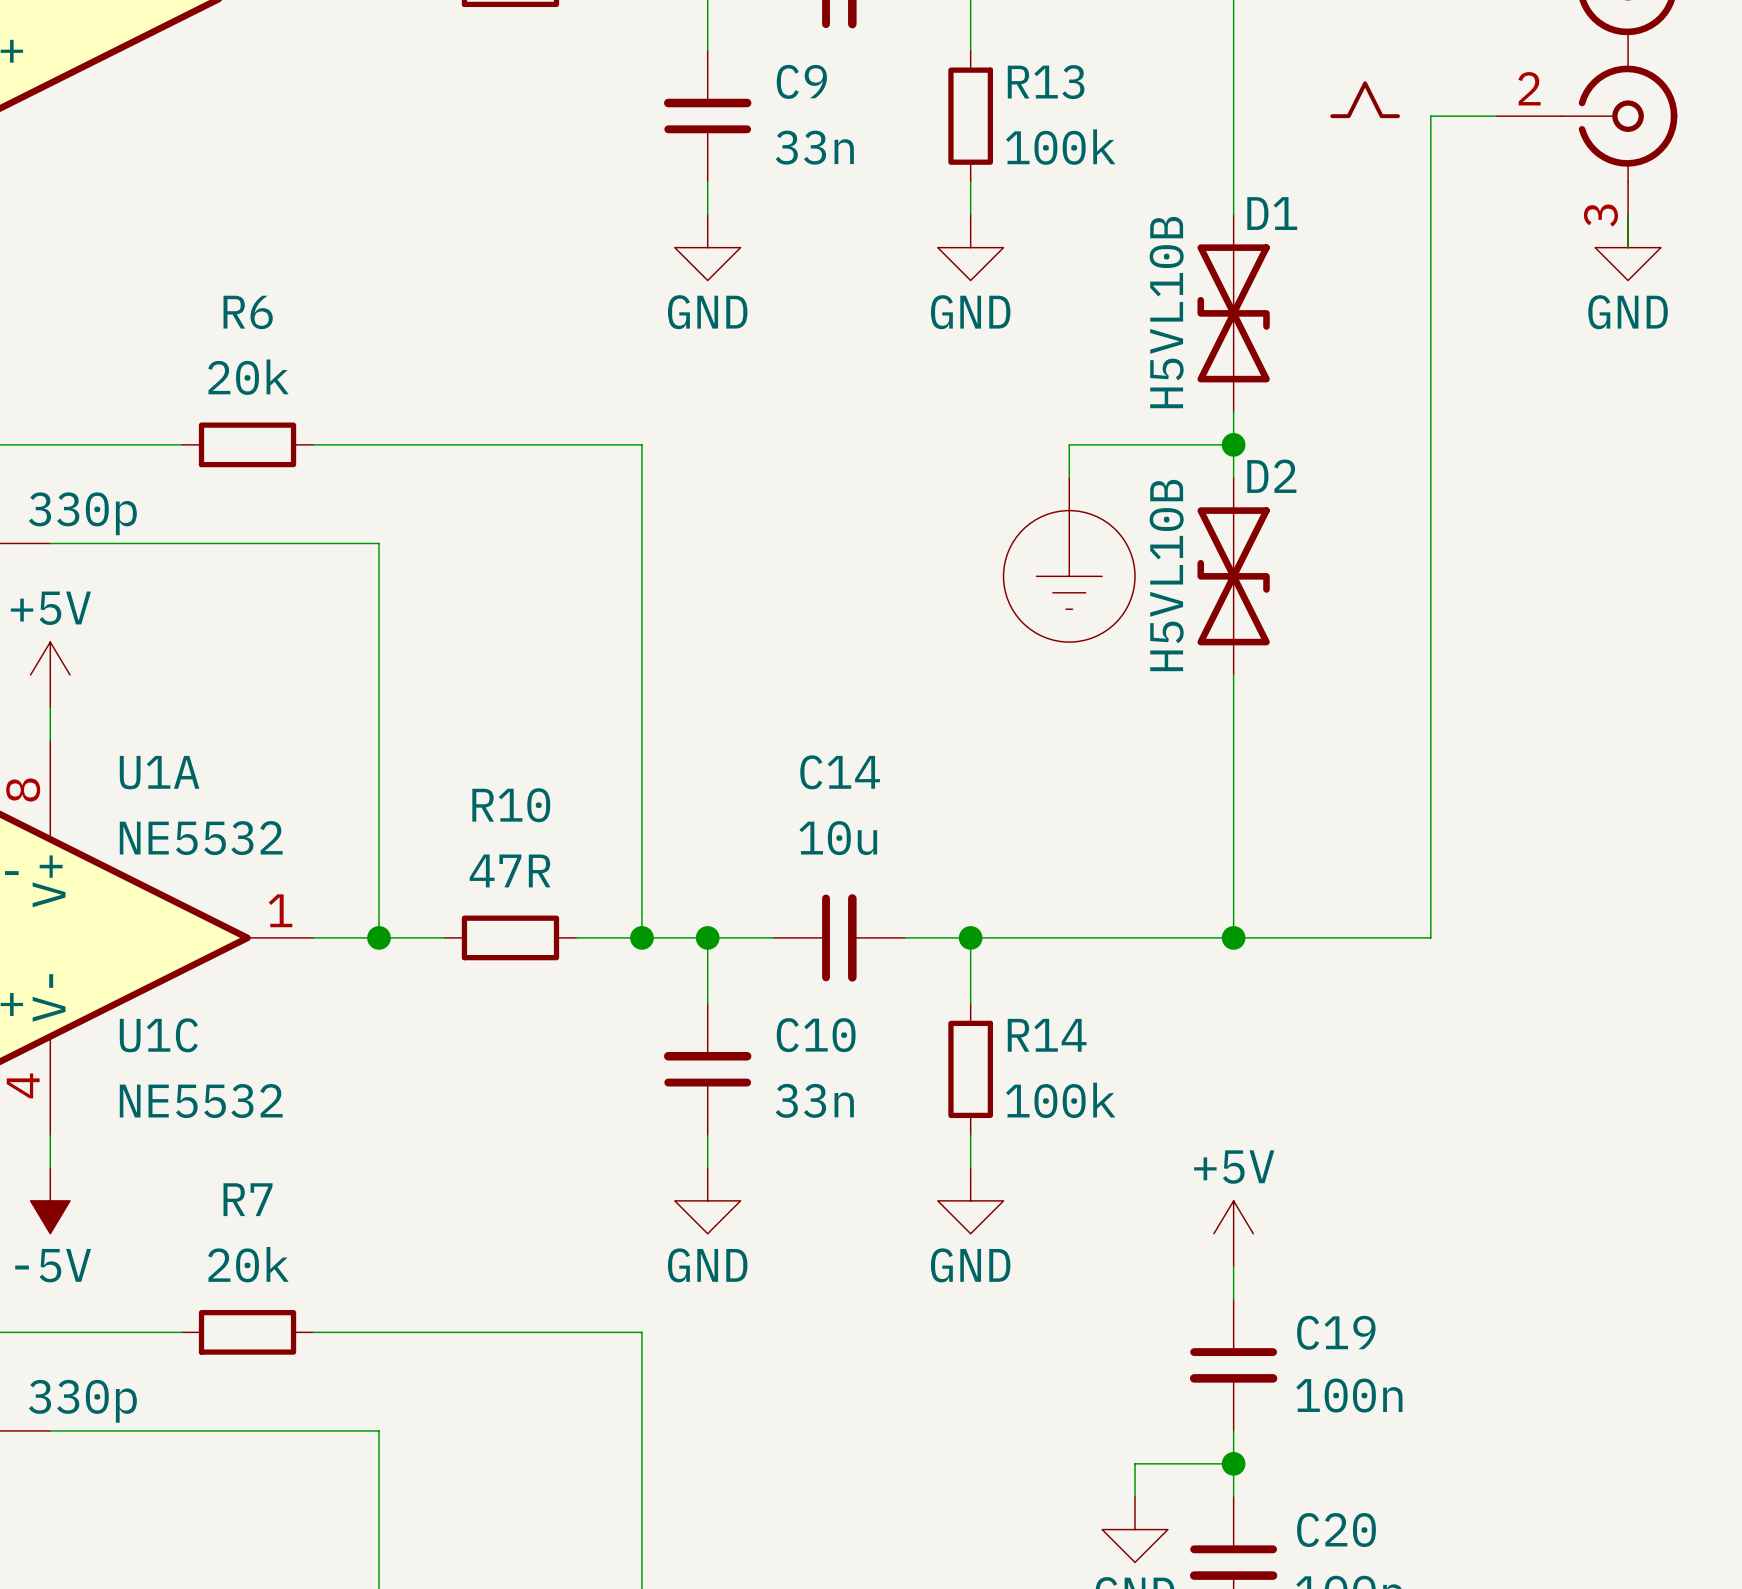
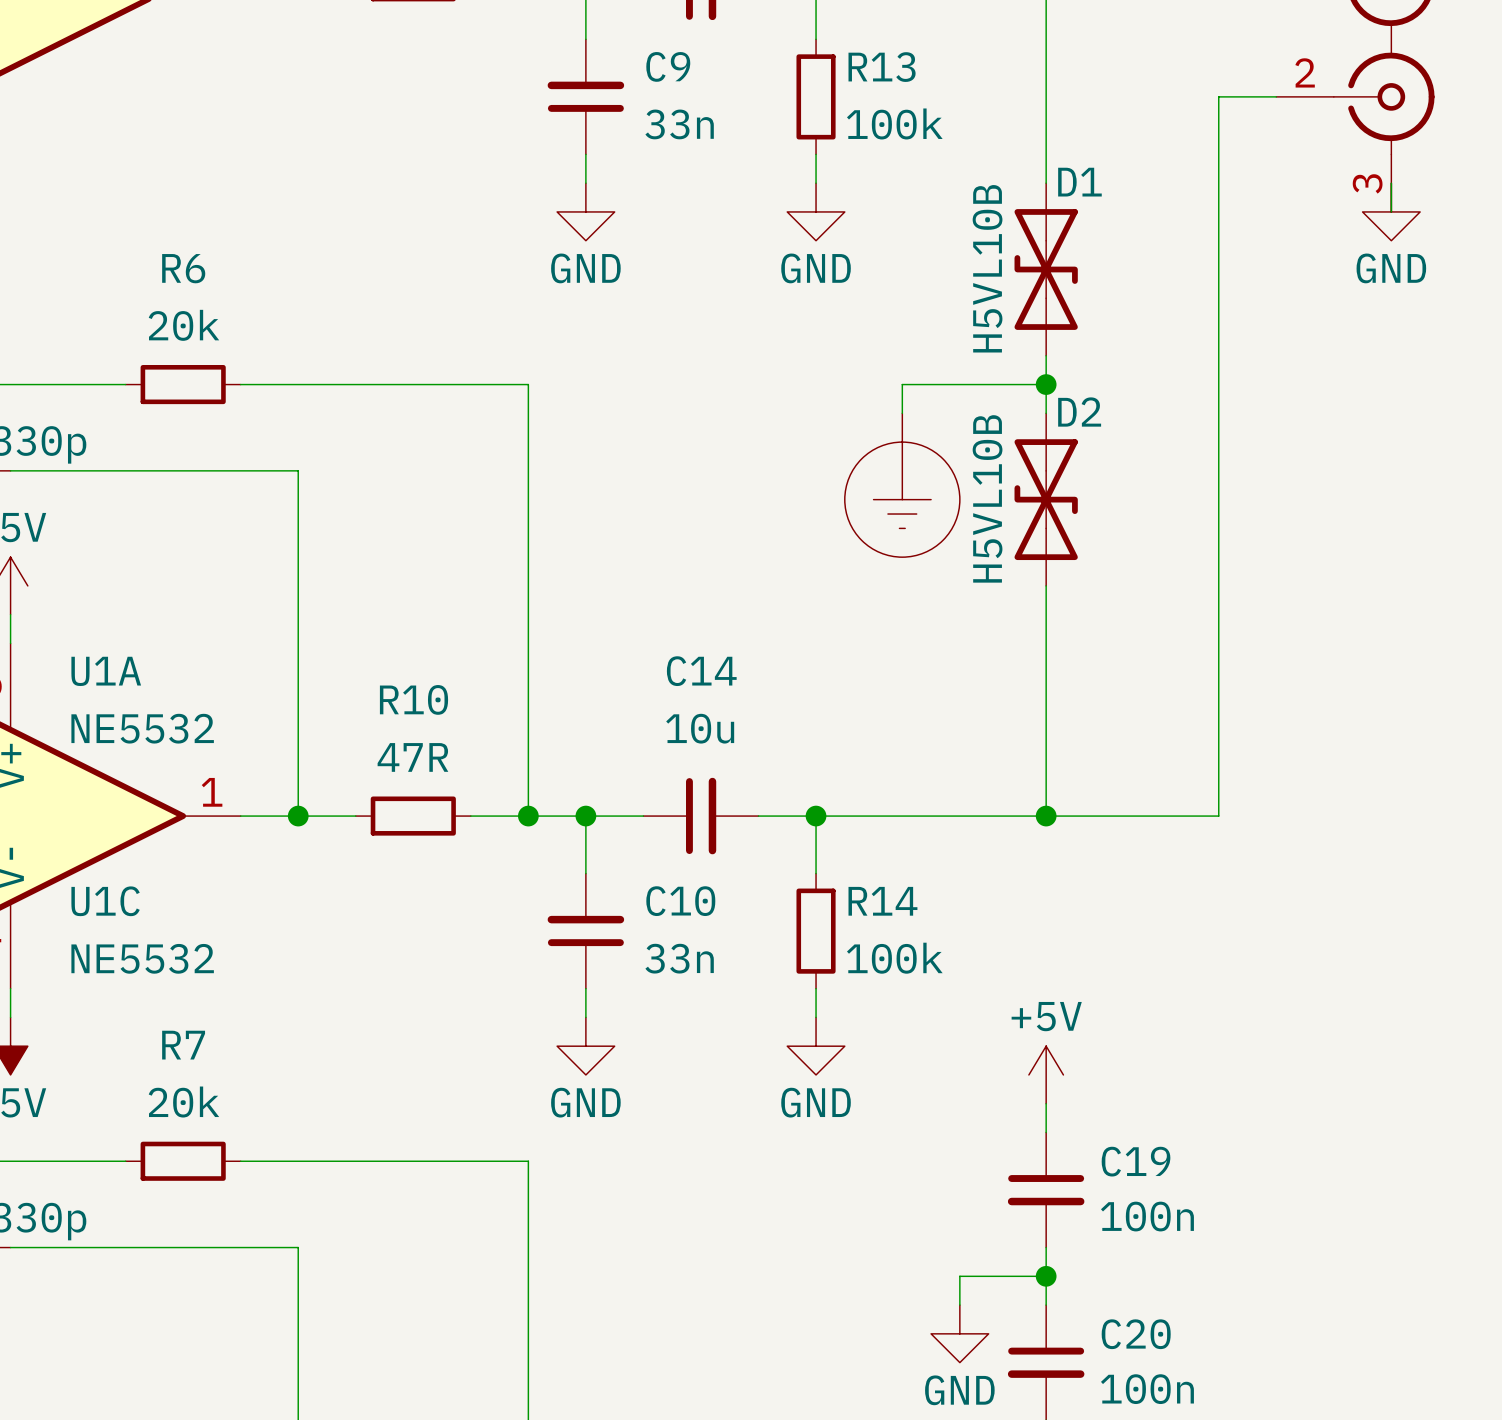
part: (1365, 99) -> none

